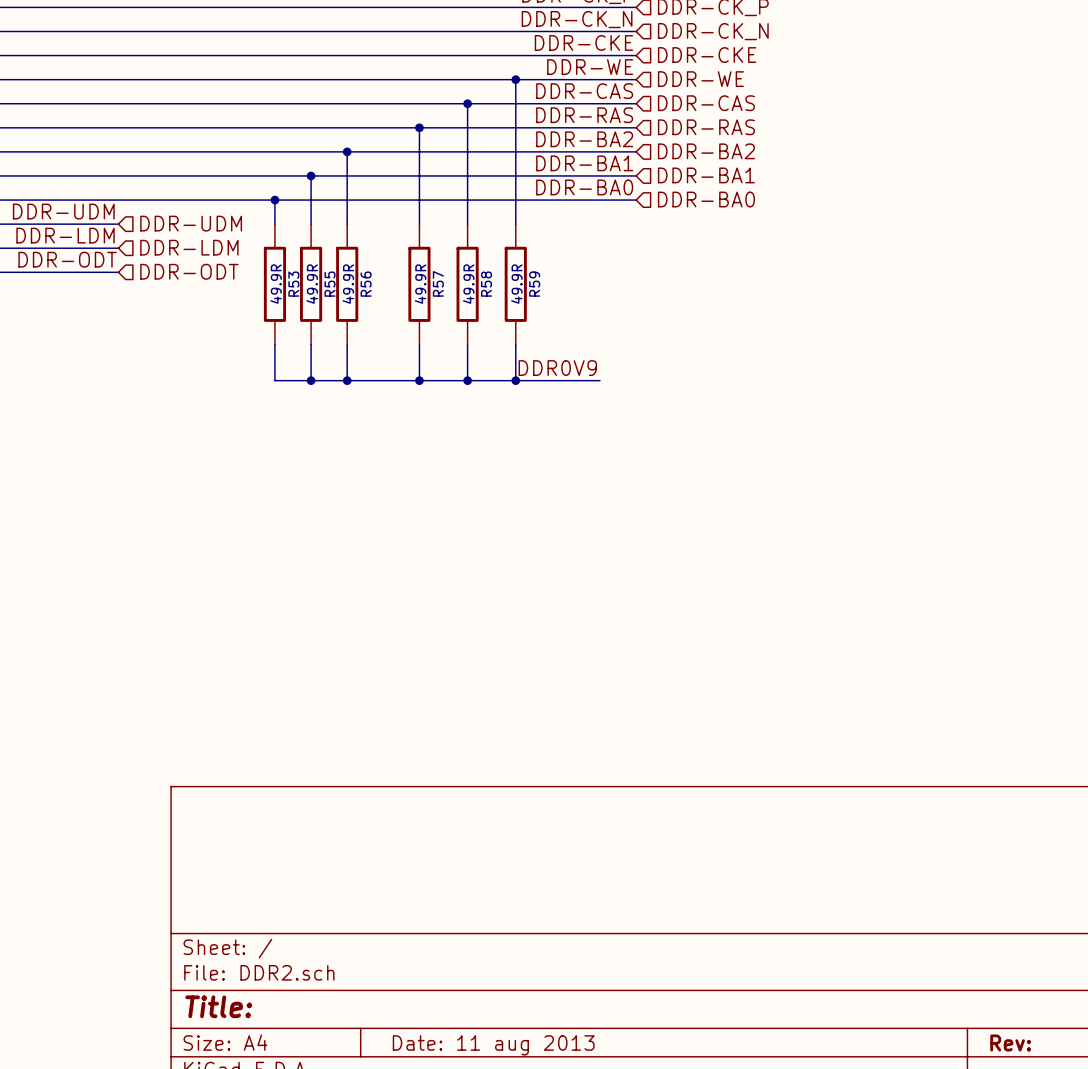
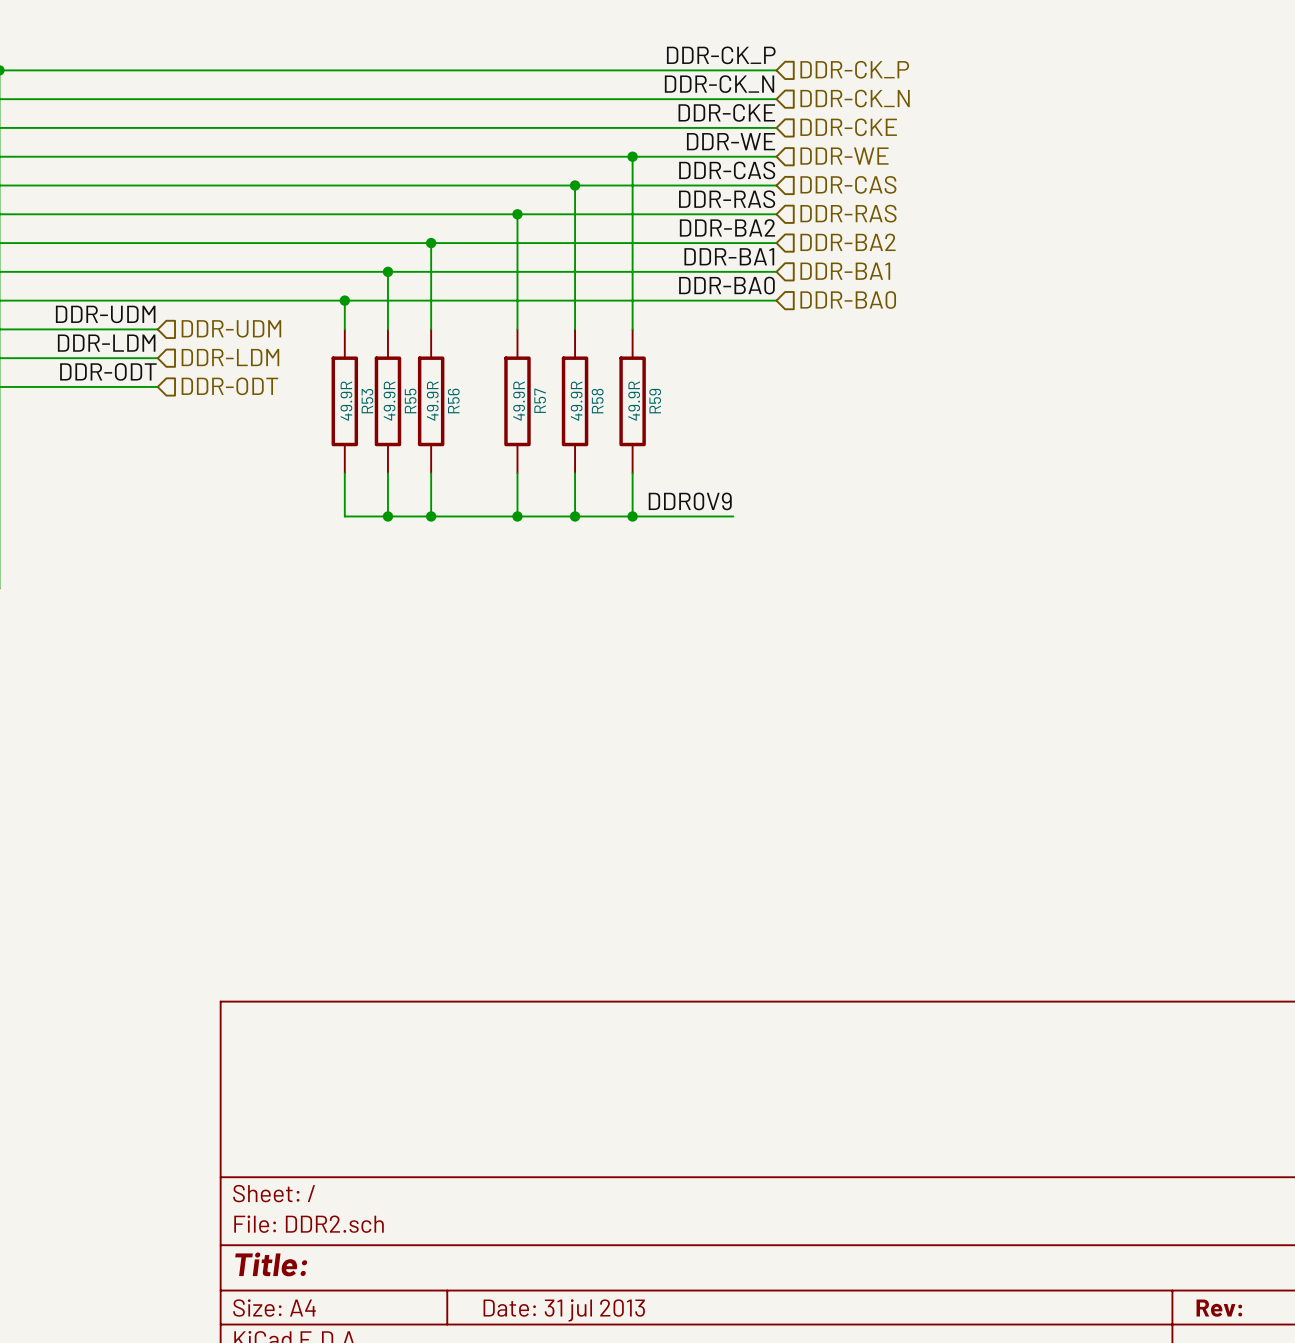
title block: Date: 11 aug 2013 (493, 1045) -> Date: 31 jul 2013 (564, 1310)

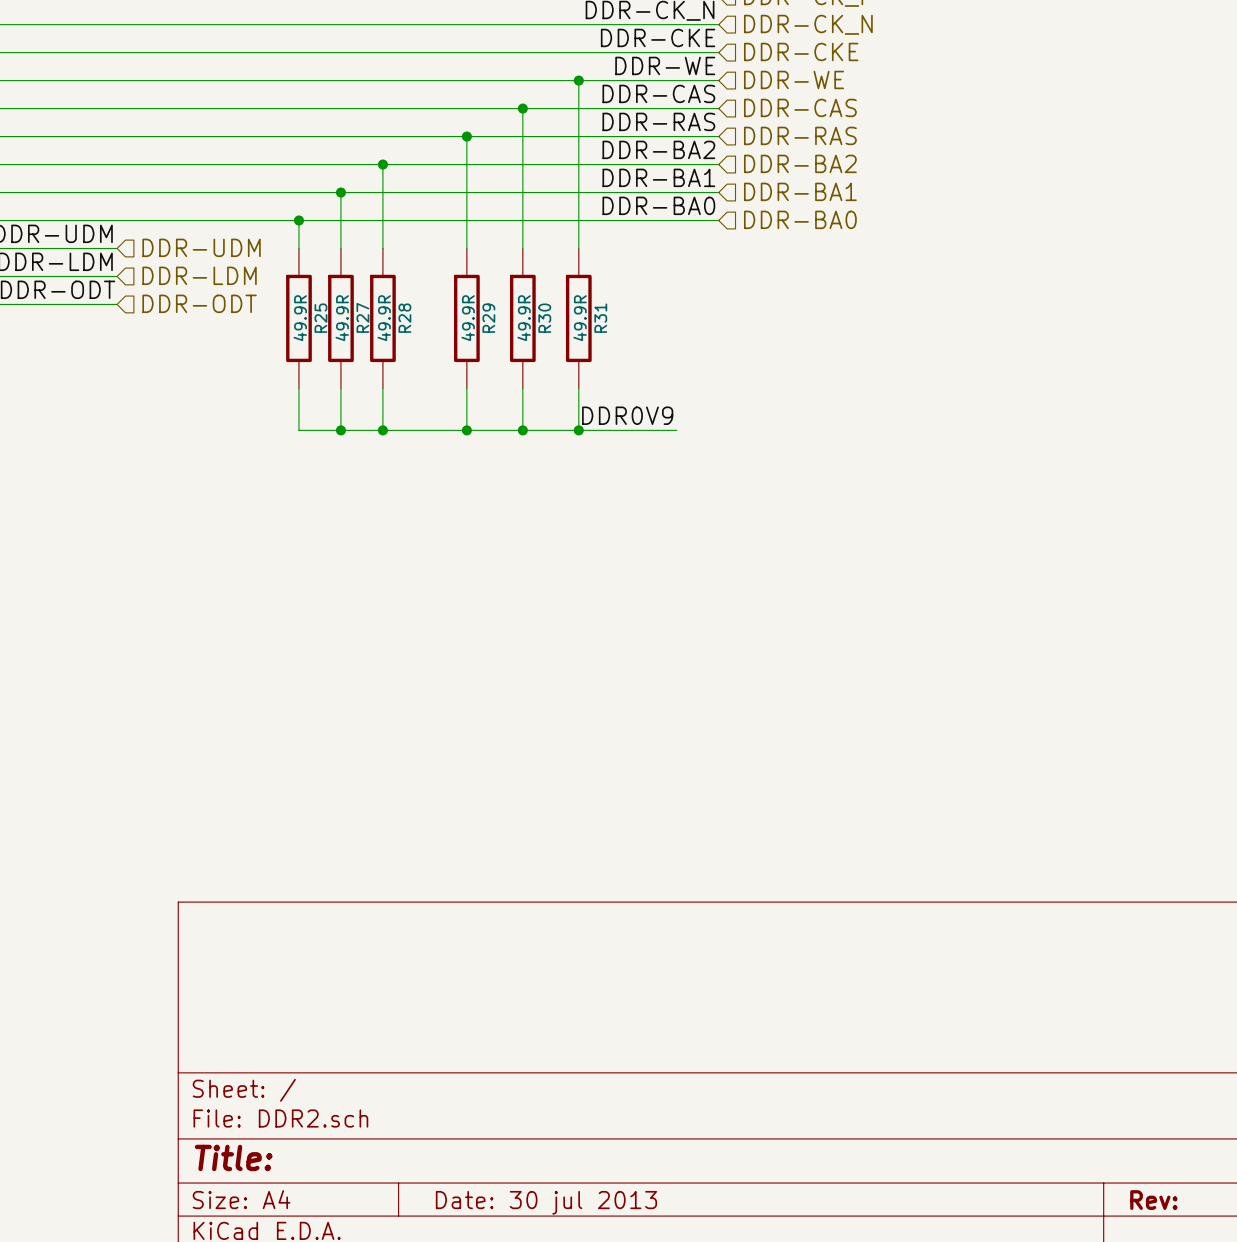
R55 name: R55 (410, 400) -> R27 (362, 317)
R56 name: R56 (453, 400) -> R28 (404, 318)
R57 name: R57 (540, 400) -> R29 (488, 318)
R53 name: R53 (367, 401) -> R25 (320, 318)
R58 name: R58 (597, 401) -> R30 (544, 318)
R59 name: R59 (655, 401) -> R31 (600, 318)
title block: Date: 31 jul 2013 (564, 1310) -> Date: 30 jul 2013 (546, 1202)

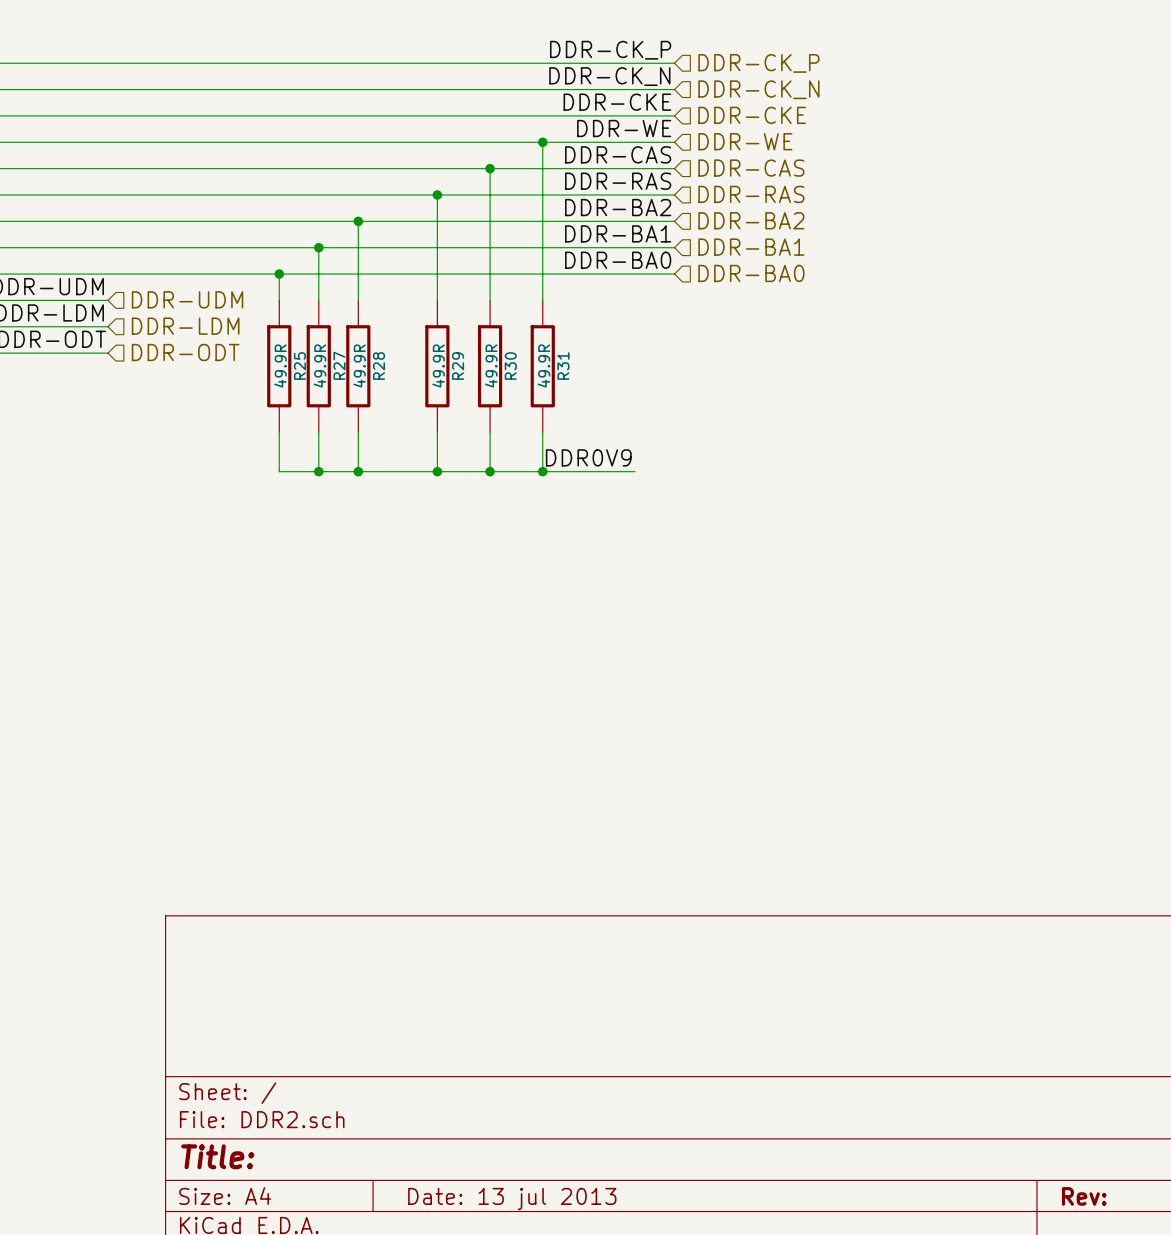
title block: Date: 30 jul 2013 (546, 1202) -> Date: 13 jul 2013 (512, 1199)

